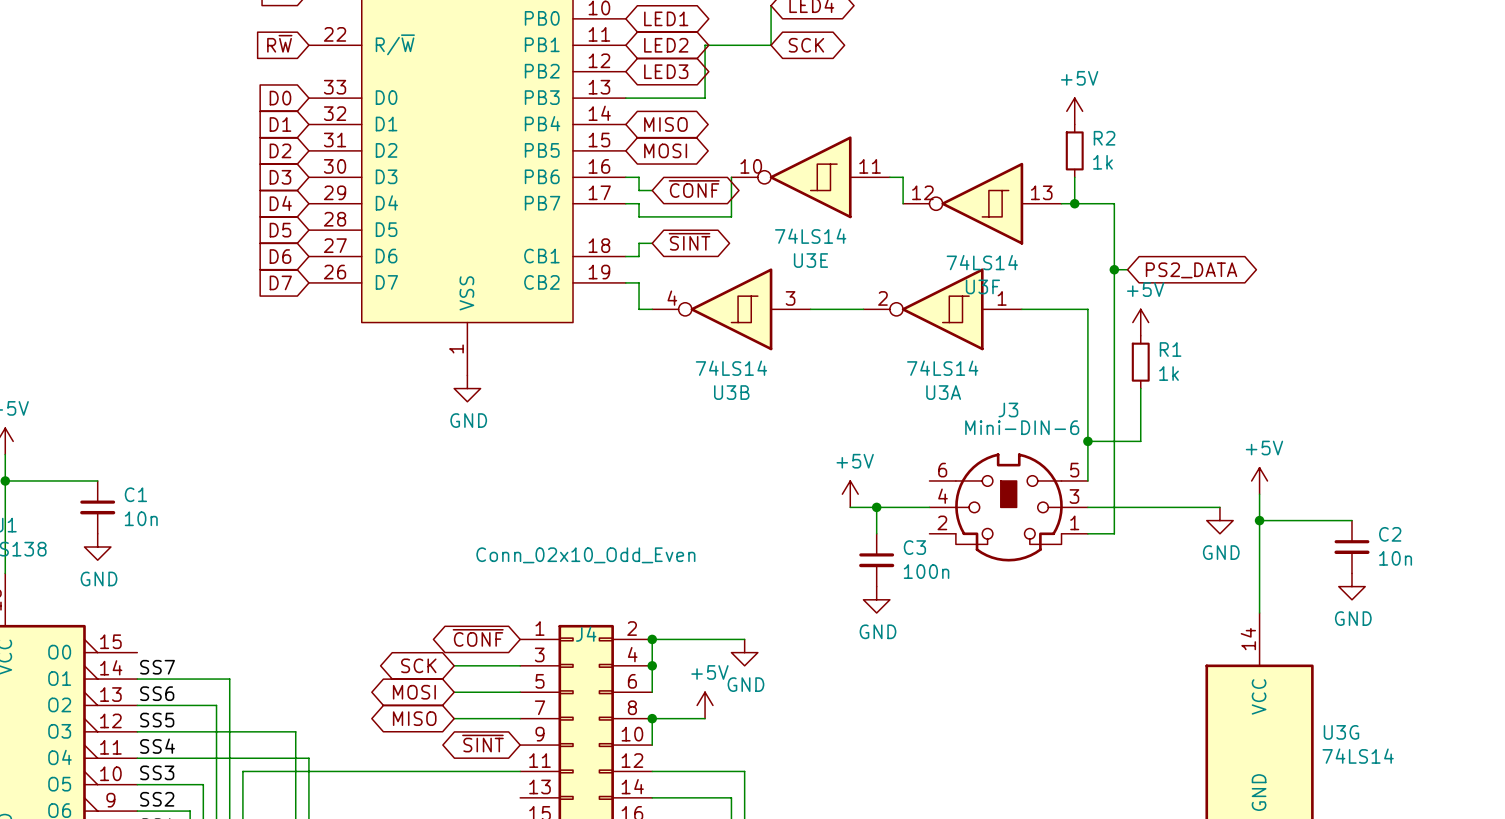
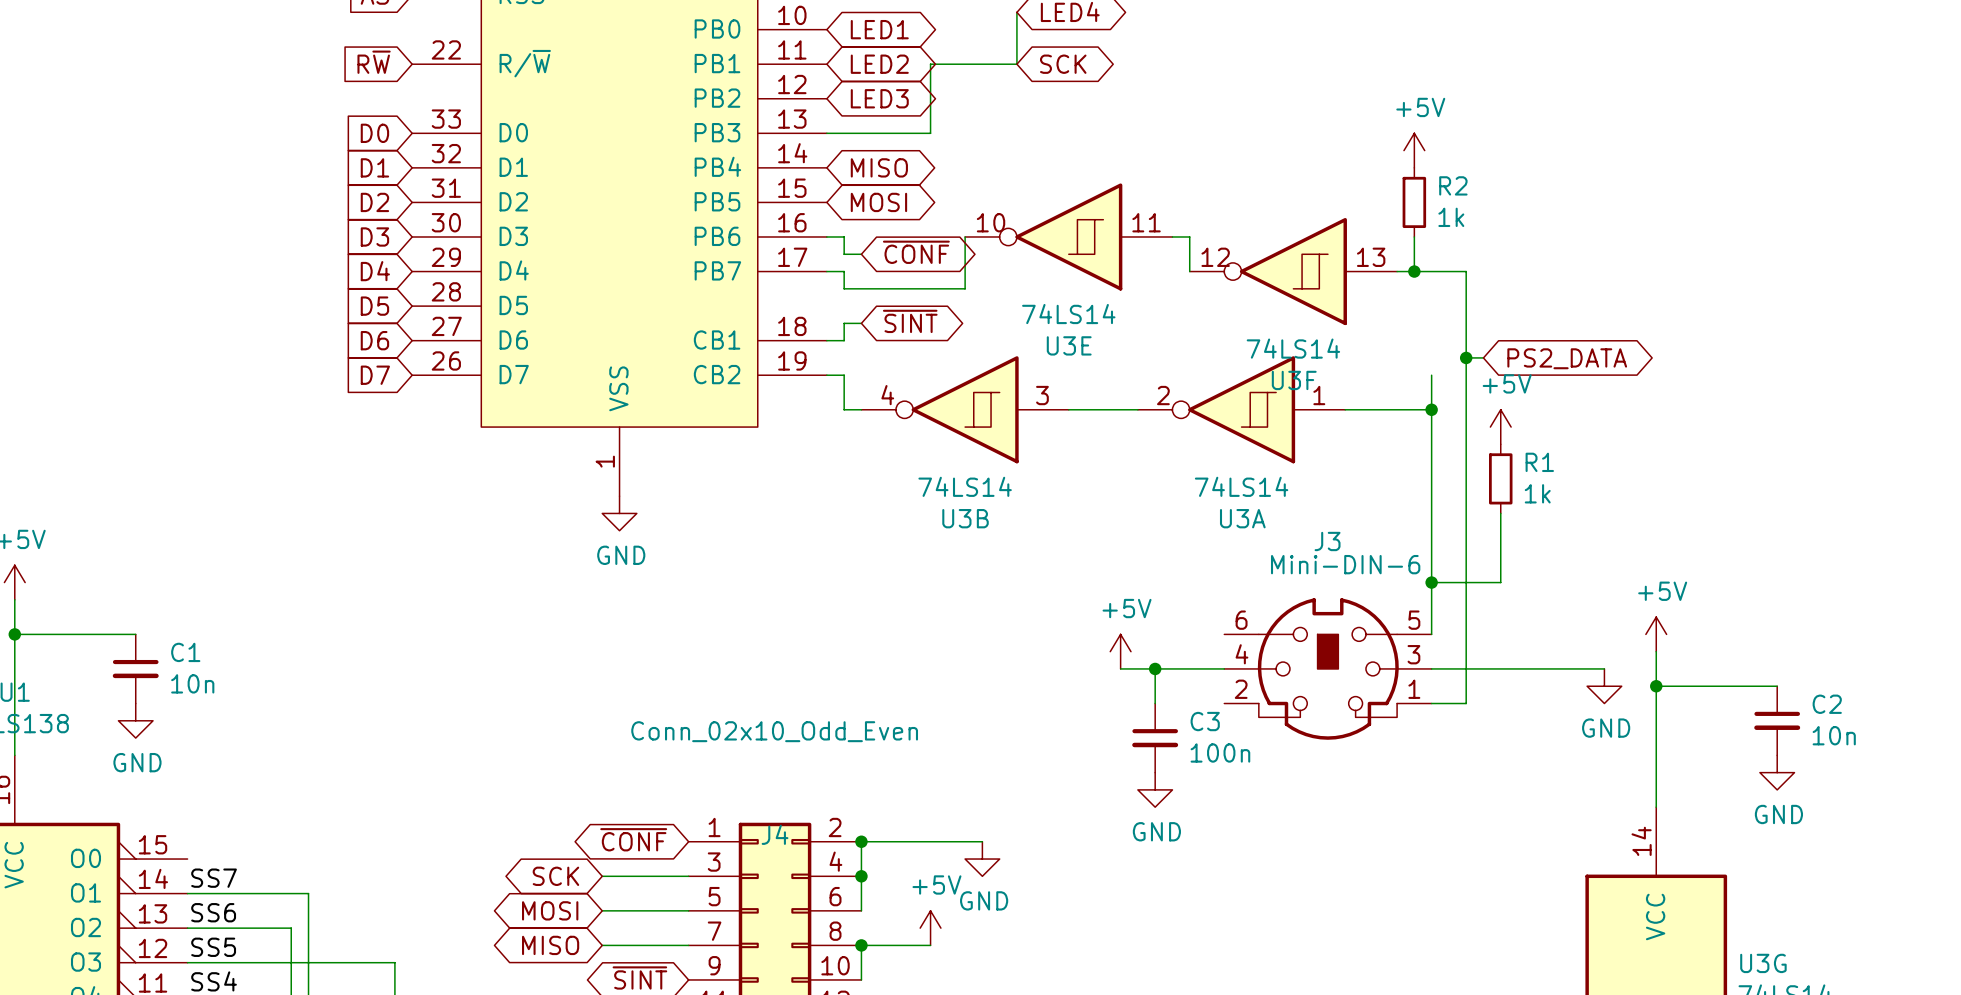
wire: none -> (1431, 375) (1431, 409)
junction: none -> (1431, 409)

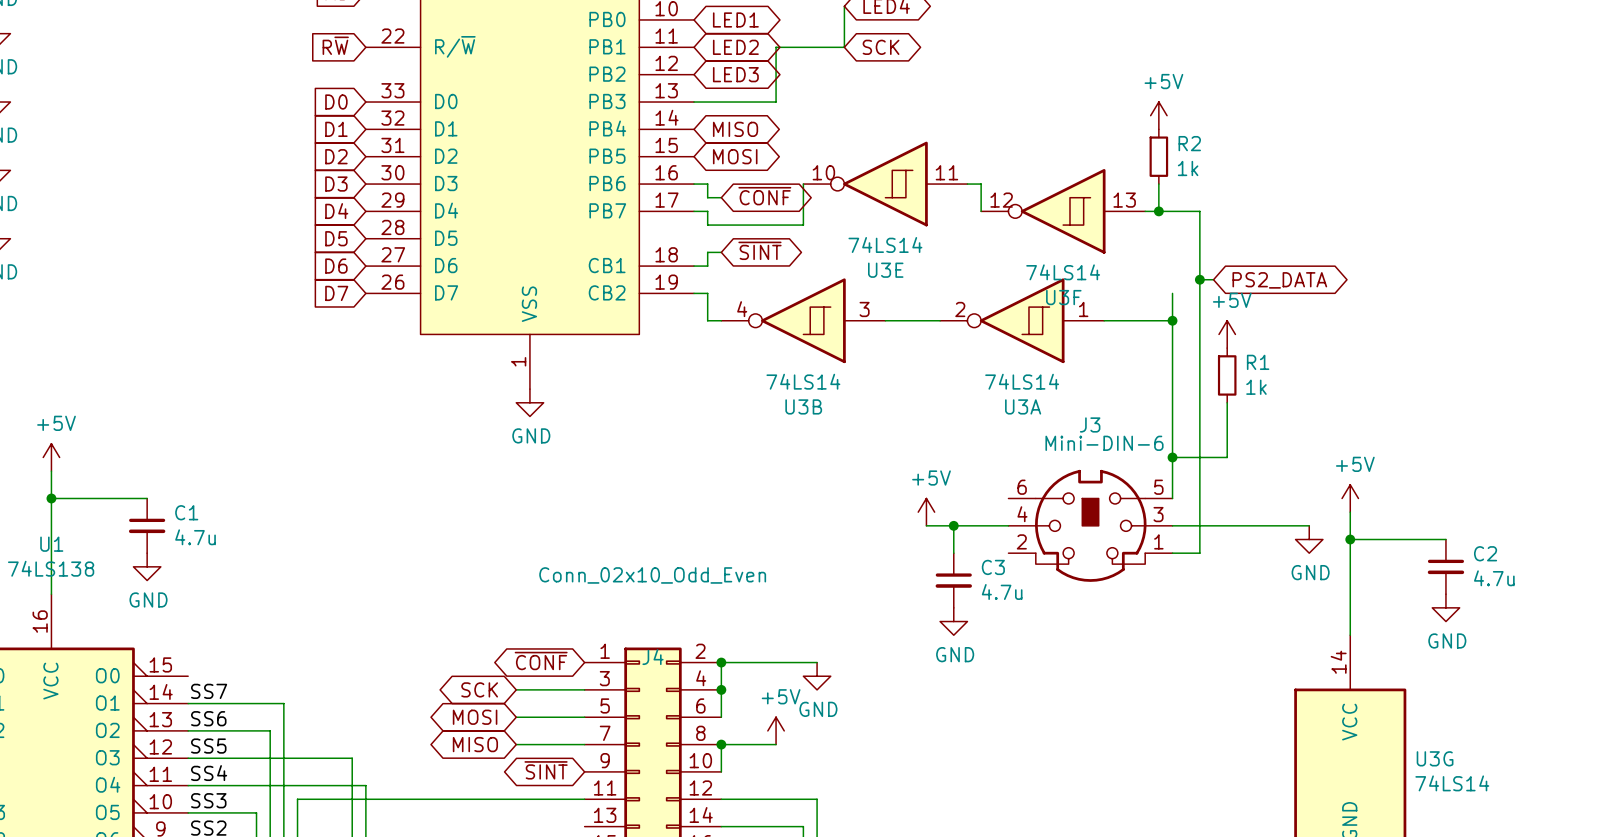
C1 value: 10n (192, 683) -> 4.7u (195, 537)
C2 value: 10n (1834, 735) -> 4.7u (1494, 578)
C3 value: 100n (1220, 752) -> 4.7u (1002, 591)

